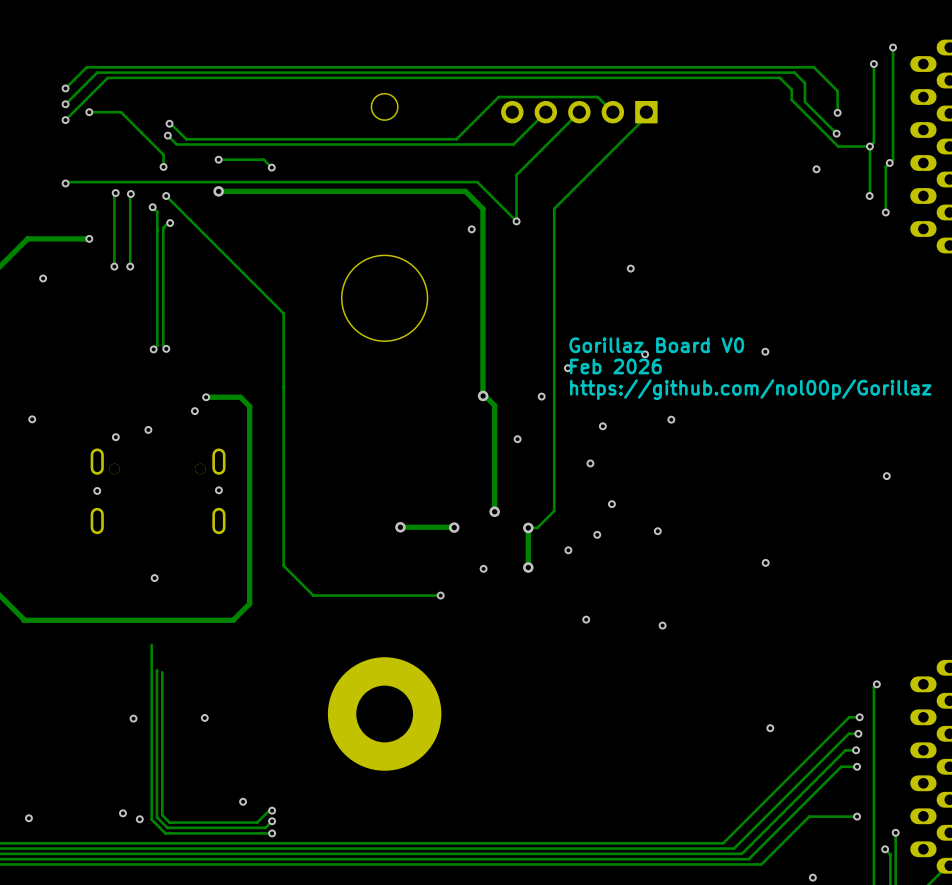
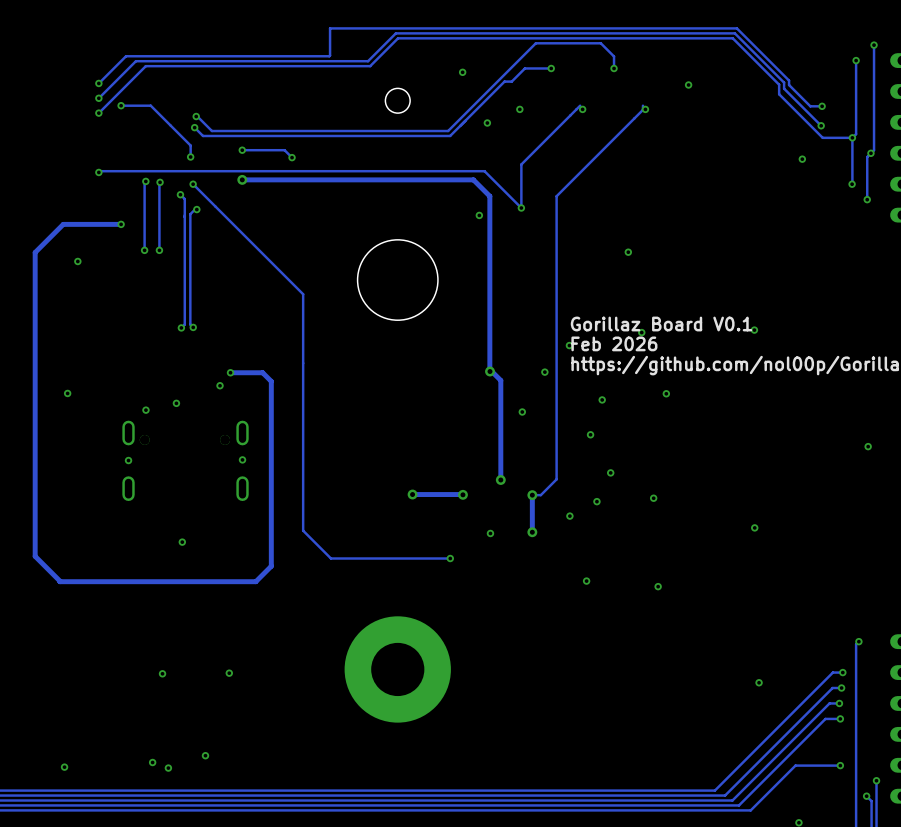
track: (86, 67) (813, 67) (837, 91) (837, 112) -> (118, 63) (126, 56) (329, 56) (330, 28) (736, 28) (789, 80) (789, 85) (810, 106) (822, 106)
track: (97, 72) (794, 72) (804, 83) (804, 101) -> (128, 68) (135, 61) (368, 61) (395, 33) (734, 33) (784, 82) (784, 88) (791, 96)
via: none -> (551, 68)
via: none -> (614, 68)
via: none -> (462, 72)
track: (779, 77) (107, 77) -> (768, 73) (732, 38) (398, 38) (370, 66) (145, 66) (138, 73)
via: none -> (688, 84)
track: (545, 112) (513, 144) (440, 144) -> (551, 68) (524, 68) (511, 81) (504, 81) (450, 135)
part: (579, 112) -> none
track: (612, 112) (597, 97) (498, 97) (456, 139) (438, 139) -> (614, 68) (614, 56) (600, 43) (535, 43) (448, 131)
via: none -> (519, 109)
via: none -> (582, 109)
via: none -> (645, 109)
via: none -> (487, 123)
text: Gorillaz Board V0 (656, 345) -> Gorillaz Board V0.1 (661, 324)
track: (151, 645) (151, 819) (165, 833) (272, 833) -> none
track: (156, 670) (156, 817) (167, 827) (265, 827) (272, 821) -> none
track: (162, 672) (162, 815) (169, 822) (257, 822) (269, 810) (272, 810) -> none
via: (243, 801) -> none
via: none -> (205, 755)
via: (272, 810) -> none
via: (272, 821) -> none
via: (272, 833) -> none

